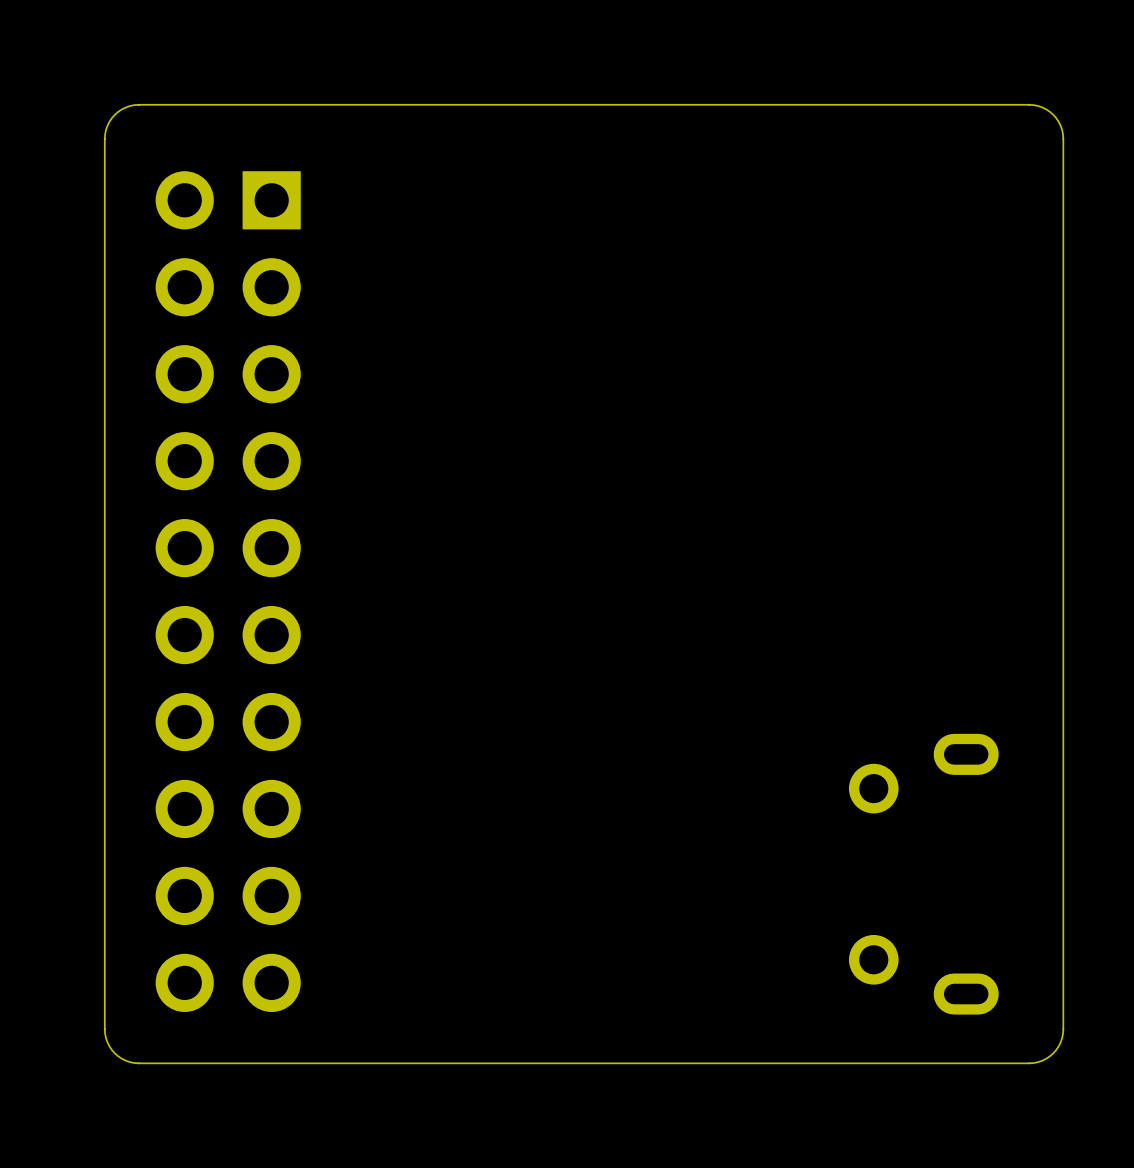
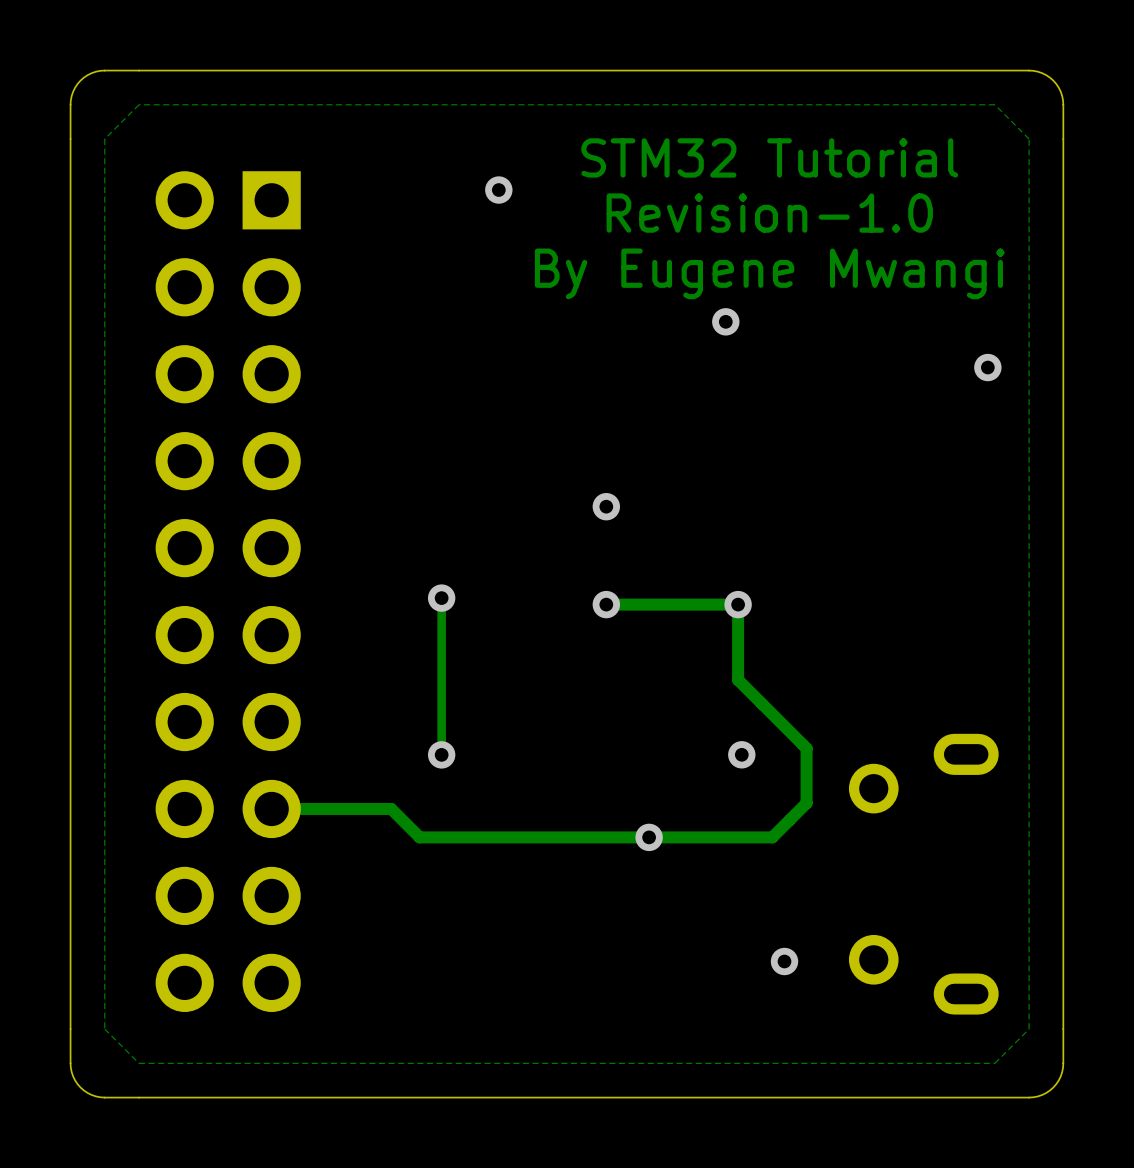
zone outline: none -> (994, 104) (1029, 139) (1029, 1029) (994, 1063) (139, 1063) (104, 1029) (104, 139) (139, 104) (994, 104)
board edge: (1063, 139) (1060, 125) (1053, 114) (1042, 107) (1029, 104) (139, 104) (125, 107) (114, 114) (107, 125) (104, 139) (104, 1029) (107, 1042) (114, 1053) (125, 1060) (139, 1063) (1029, 1063) (1042, 1060) (1053, 1053) (1060, 1042) (1063, 1029) -> (1063, 139) (1063, 100) (1058, 87) (1046, 75) (1029, 70) (104, 70) (91, 73) (80, 80) (73, 91) (70, 104) (70, 1063) (73, 1076) (80, 1087) (91, 1094) (104, 1097) (1029, 1097) (1046, 1092) (1058, 1080) (1063, 1067) (1063, 1029)
text: none -> STM32 Tutorial (769, 157)
via: none -> (498, 190)
text: none -> Revision-1.0 (769, 213)
text: none -> By Eugene Mwangi (769, 273)
via: none -> (725, 321)
via: none -> (987, 367)
via: none -> (606, 506)
track: none -> (441, 598) (441, 754)
via: none -> (441, 598)
track: none -> (606, 604) (738, 604) (738, 679) (806, 748) (806, 803) (772, 837) (419, 837) (391, 808) (271, 808)
via: none -> (606, 604)
via: none -> (738, 604)
via: none -> (441, 754)
via: none -> (741, 754)
via: none -> (649, 837)
via: none -> (784, 961)

